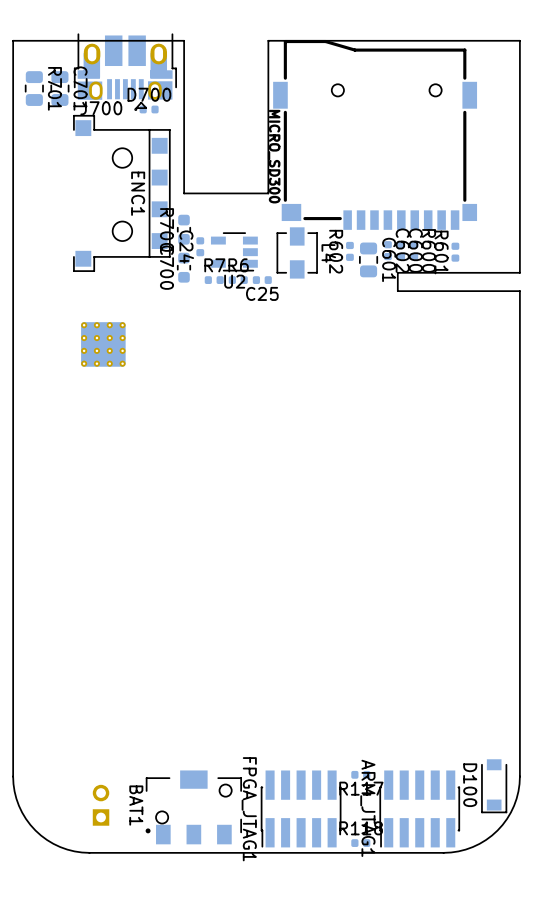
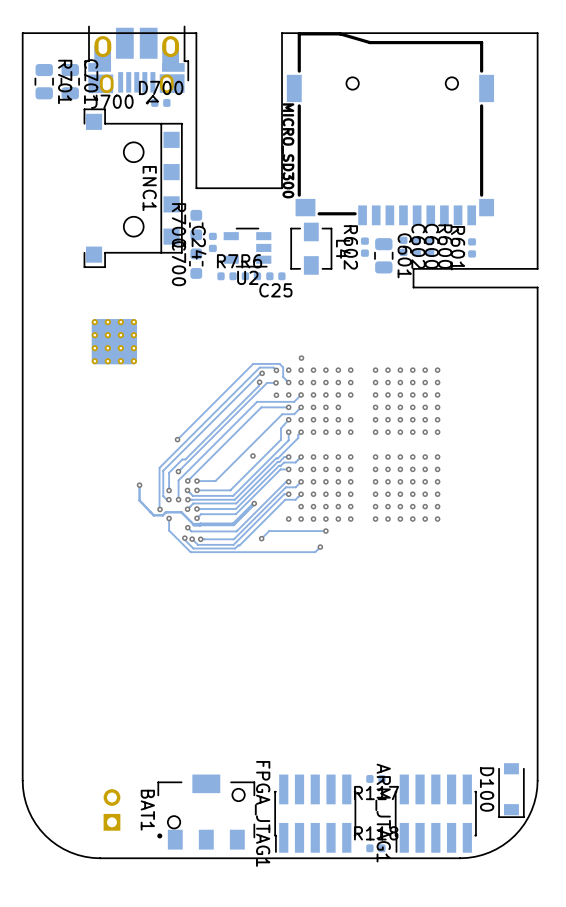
via: none -> (301, 358)
track: none -> (276, 370) (273, 367) (259, 367) (159, 467) (160, 509)
via: none -> (276, 370)
via: none -> (288, 370)
via: none -> (301, 370)
via: none -> (313, 370)
via: none -> (325, 370)
via: none -> (338, 370)
via: none -> (350, 370)
via: none -> (375, 370)
via: none -> (387, 370)
via: none -> (400, 370)
via: none -> (412, 370)
via: none -> (425, 370)
via: none -> (437, 370)
track: none -> (262, 373) (163, 470) (163, 496) (168, 499)
via: none -> (262, 373)
track: none -> (259, 382) (258, 386) (185, 459) (182, 459) (169, 472) (169, 490)
via: none -> (259, 382)
track: none -> (288, 382) (283, 377) (283, 367) (279, 363) (253, 363) (177, 439)
via: none -> (288, 382)
via: none -> (301, 382)
via: none -> (313, 382)
via: none -> (325, 382)
via: none -> (338, 382)
via: none -> (350, 382)
via: none -> (375, 382)
via: none -> (387, 382)
via: none -> (400, 382)
via: none -> (412, 382)
via: none -> (425, 382)
via: none -> (437, 382)
track: none -> (276, 382) (267, 382) (178, 471)
via: none -> (276, 382)
via: none -> (288, 394)
track: none -> (301, 394) (294, 401) (257, 401) (178, 480) (178, 499)
via: none -> (301, 394)
via: none -> (313, 394)
via: none -> (325, 394)
via: none -> (338, 394)
via: none -> (350, 394)
via: none -> (375, 394)
via: none -> (387, 394)
via: none -> (400, 394)
via: none -> (412, 394)
via: none -> (425, 394)
via: none -> (437, 394)
via: none -> (276, 395)
track: none -> (288, 407) (261, 407) (187, 480)
via: none -> (288, 407)
track: none -> (301, 407) (294, 414) (282, 414) (215, 481) (197, 481)
via: none -> (301, 407)
via: none -> (313, 407)
via: none -> (325, 407)
via: none -> (338, 407)
via: none -> (375, 407)
via: none -> (387, 407)
via: none -> (400, 407)
via: none -> (412, 407)
via: none -> (425, 407)
via: none -> (437, 407)
track: none -> (288, 419) (281, 428) (281, 439) (230, 490)
via: none -> (288, 419)
via: none -> (301, 419)
via: none -> (313, 419)
via: none -> (325, 419)
via: none -> (338, 419)
via: none -> (350, 419)
via: none -> (375, 419)
via: none -> (387, 419)
via: none -> (400, 419)
via: none -> (412, 419)
via: none -> (425, 419)
via: none -> (437, 419)
track: none -> (288, 432) (288, 440) (233, 495) (192, 495) (187, 490)
via: none -> (288, 432)
track: none -> (301, 432) (298, 437) (234, 499) (191, 499)
via: none -> (301, 432)
via: none -> (313, 432)
via: none -> (325, 432)
via: none -> (338, 432)
via: none -> (350, 432)
via: none -> (375, 432)
via: none -> (387, 432)
via: none -> (400, 432)
via: none -> (412, 432)
via: none -> (425, 432)
via: none -> (437, 432)
via: none -> (177, 439)
via: none -> (252, 455)
track: none -> (288, 456) (284, 456) (277, 462) (236, 503) (193, 503) (187, 509)
via: none -> (288, 456)
track: none -> (301, 456) (295, 462) (284, 462) (279, 465) (235, 508) (197, 508)
via: none -> (301, 456)
via: none -> (313, 456)
via: none -> (325, 456)
via: none -> (338, 456)
via: none -> (350, 456)
via: none -> (375, 456)
via: none -> (387, 456)
via: none -> (400, 456)
via: none -> (412, 456)
via: none -> (425, 456)
via: none -> (437, 456)
track: none -> (288, 469) (280, 469) (235, 514) (201, 514) (197, 518)
via: none -> (288, 469)
via: none -> (301, 469)
via: none -> (313, 469)
via: none -> (325, 469)
via: none -> (338, 469)
via: none -> (350, 469)
via: none -> (375, 469)
via: none -> (387, 469)
via: none -> (400, 469)
via: none -> (412, 469)
via: none -> (425, 469)
via: none -> (437, 469)
via: none -> (178, 471)
via: none -> (187, 480)
via: none -> (197, 481)
track: none -> (288, 481) (286, 481) (236, 531) (191, 531) (187, 527)
via: none -> (288, 481)
track: none -> (301, 481) (295, 487) (285, 487) (233, 539) (200, 539)
via: none -> (301, 481)
via: none -> (313, 481)
via: none -> (325, 481)
via: none -> (338, 481)
via: none -> (350, 481)
via: none -> (375, 481)
via: none -> (387, 481)
via: none -> (400, 481)
via: none -> (412, 481)
via: none -> (425, 481)
via: none -> (437, 481)
track: none -> (139, 485) (139, 500) (153, 515) (162, 515) (165, 512) (181, 512) (193, 524) (233, 524) (254, 503)
via: none -> (139, 485)
via: none -> (169, 490)
via: none -> (187, 490)
via: none -> (197, 490)
track: none -> (230, 490) (197, 490)
track: none -> (288, 494) (284, 494) (233, 544) (197, 544) (192, 539)
via: none -> (288, 494)
track: none -> (301, 494) (295, 499) (285, 499) (235, 548) (193, 548) (184, 538)
via: none -> (301, 494)
via: none -> (313, 494)
via: none -> (325, 494)
via: none -> (338, 494)
via: none -> (350, 494)
via: none -> (375, 494)
via: none -> (387, 494)
via: none -> (400, 494)
via: none -> (412, 494)
via: none -> (425, 494)
via: none -> (437, 494)
via: none -> (168, 499)
via: none -> (178, 499)
via: none -> (187, 499)
via: none -> (254, 503)
via: none -> (301, 506)
via: none -> (313, 506)
via: none -> (325, 506)
via: none -> (338, 506)
via: none -> (350, 506)
via: none -> (375, 506)
via: none -> (387, 506)
via: none -> (400, 506)
via: none -> (412, 506)
via: none -> (425, 506)
via: none -> (437, 506)
via: none -> (160, 509)
via: none -> (187, 509)
via: none -> (197, 508)
track: none -> (169, 518) (169, 530) (190, 552) (315, 552) (320, 547)
via: none -> (169, 518)
via: none -> (197, 518)
via: none -> (288, 519)
via: none -> (301, 519)
via: none -> (313, 519)
via: none -> (325, 519)
via: none -> (338, 519)
via: none -> (350, 519)
via: none -> (375, 519)
via: none -> (387, 519)
via: none -> (400, 519)
via: none -> (412, 519)
via: none -> (425, 519)
via: none -> (437, 519)
via: none -> (187, 527)
track: none -> (325, 531) (269, 531) (261, 538)
via: none -> (325, 531)
via: none -> (184, 538)
via: none -> (192, 539)
via: none -> (200, 539)
via: none -> (261, 538)
via: none -> (320, 547)

